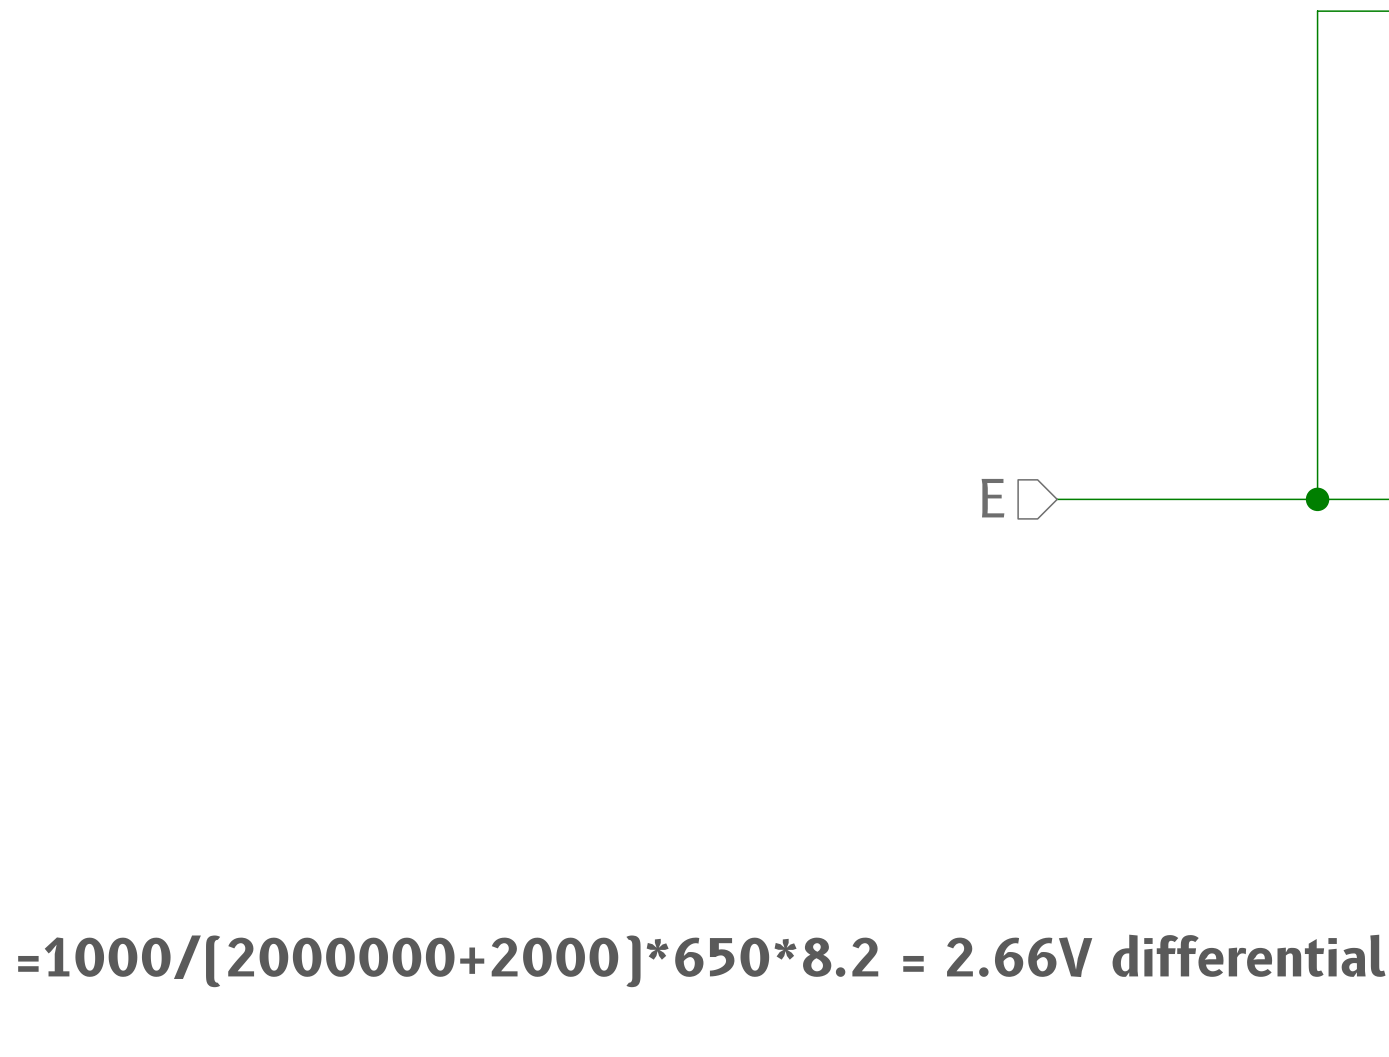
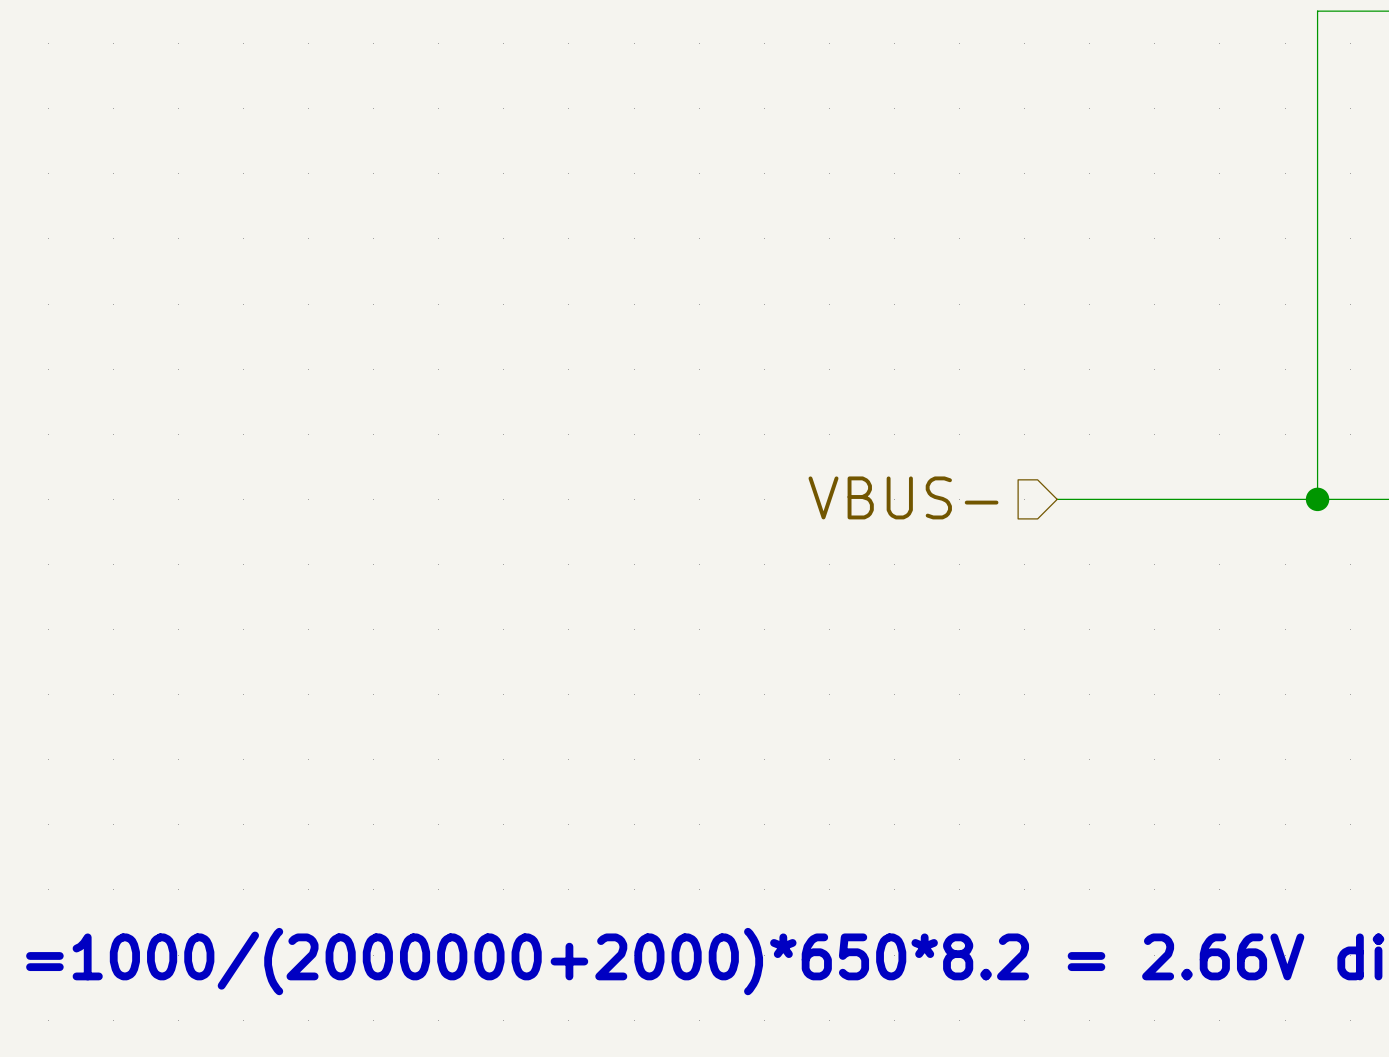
hierarchical label: E (992, 498) -> VBUS- (903, 497)

